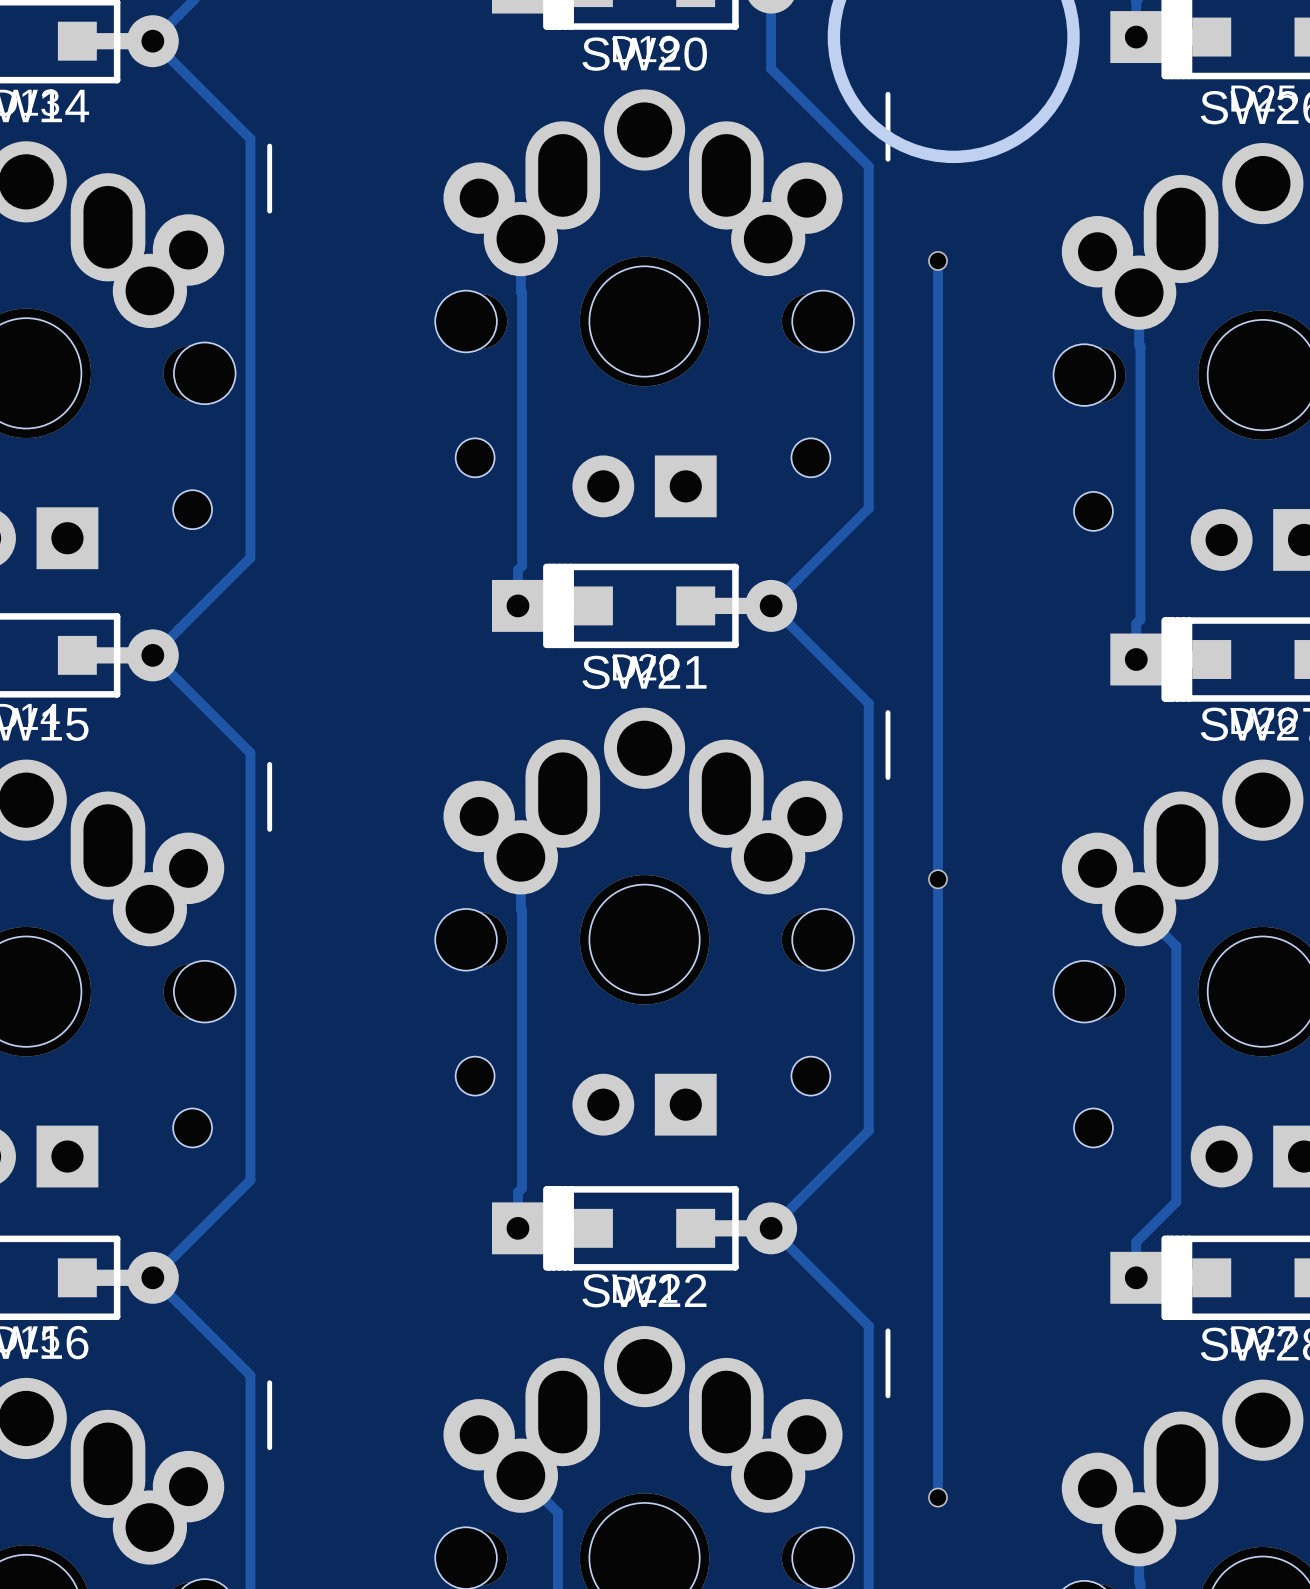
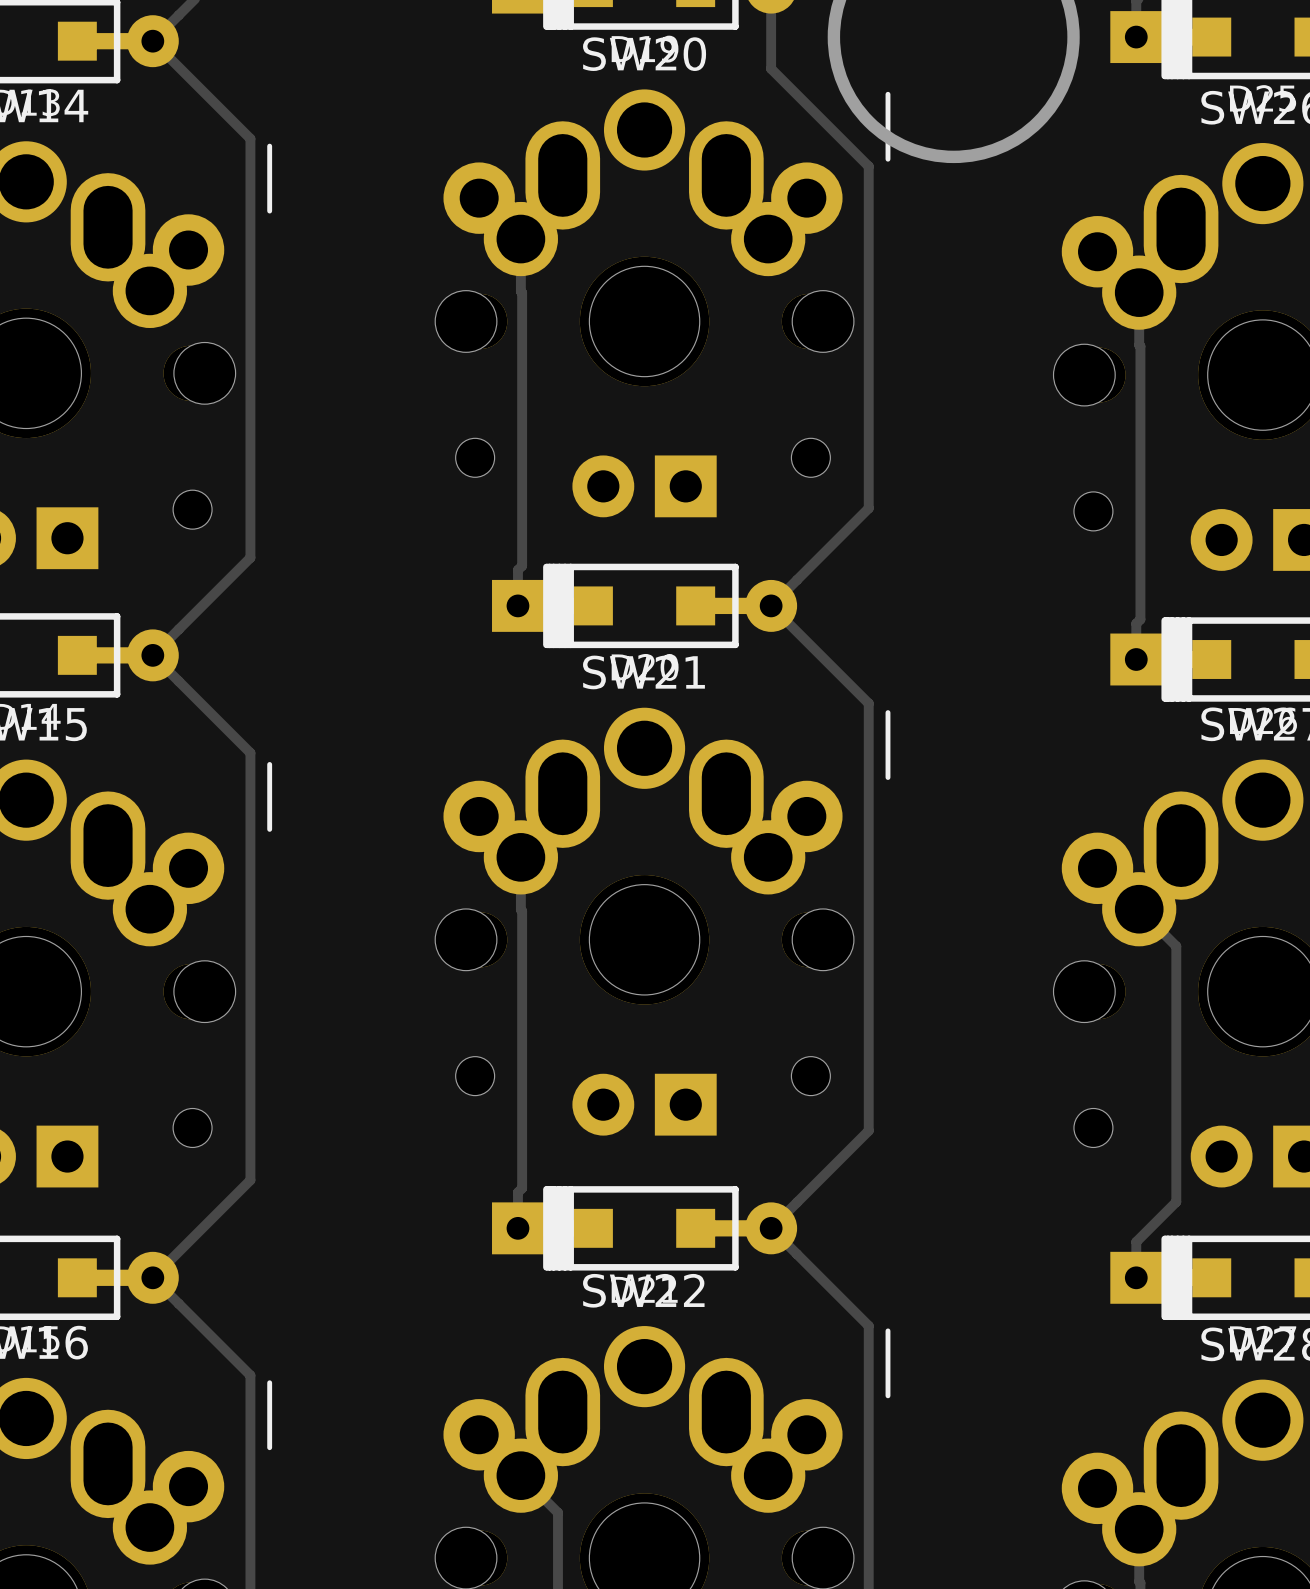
track: (937, 260) (937, 1497) -> none
via: (937, 260) -> none
via: (937, 879) -> none
via: (937, 1497) -> none

